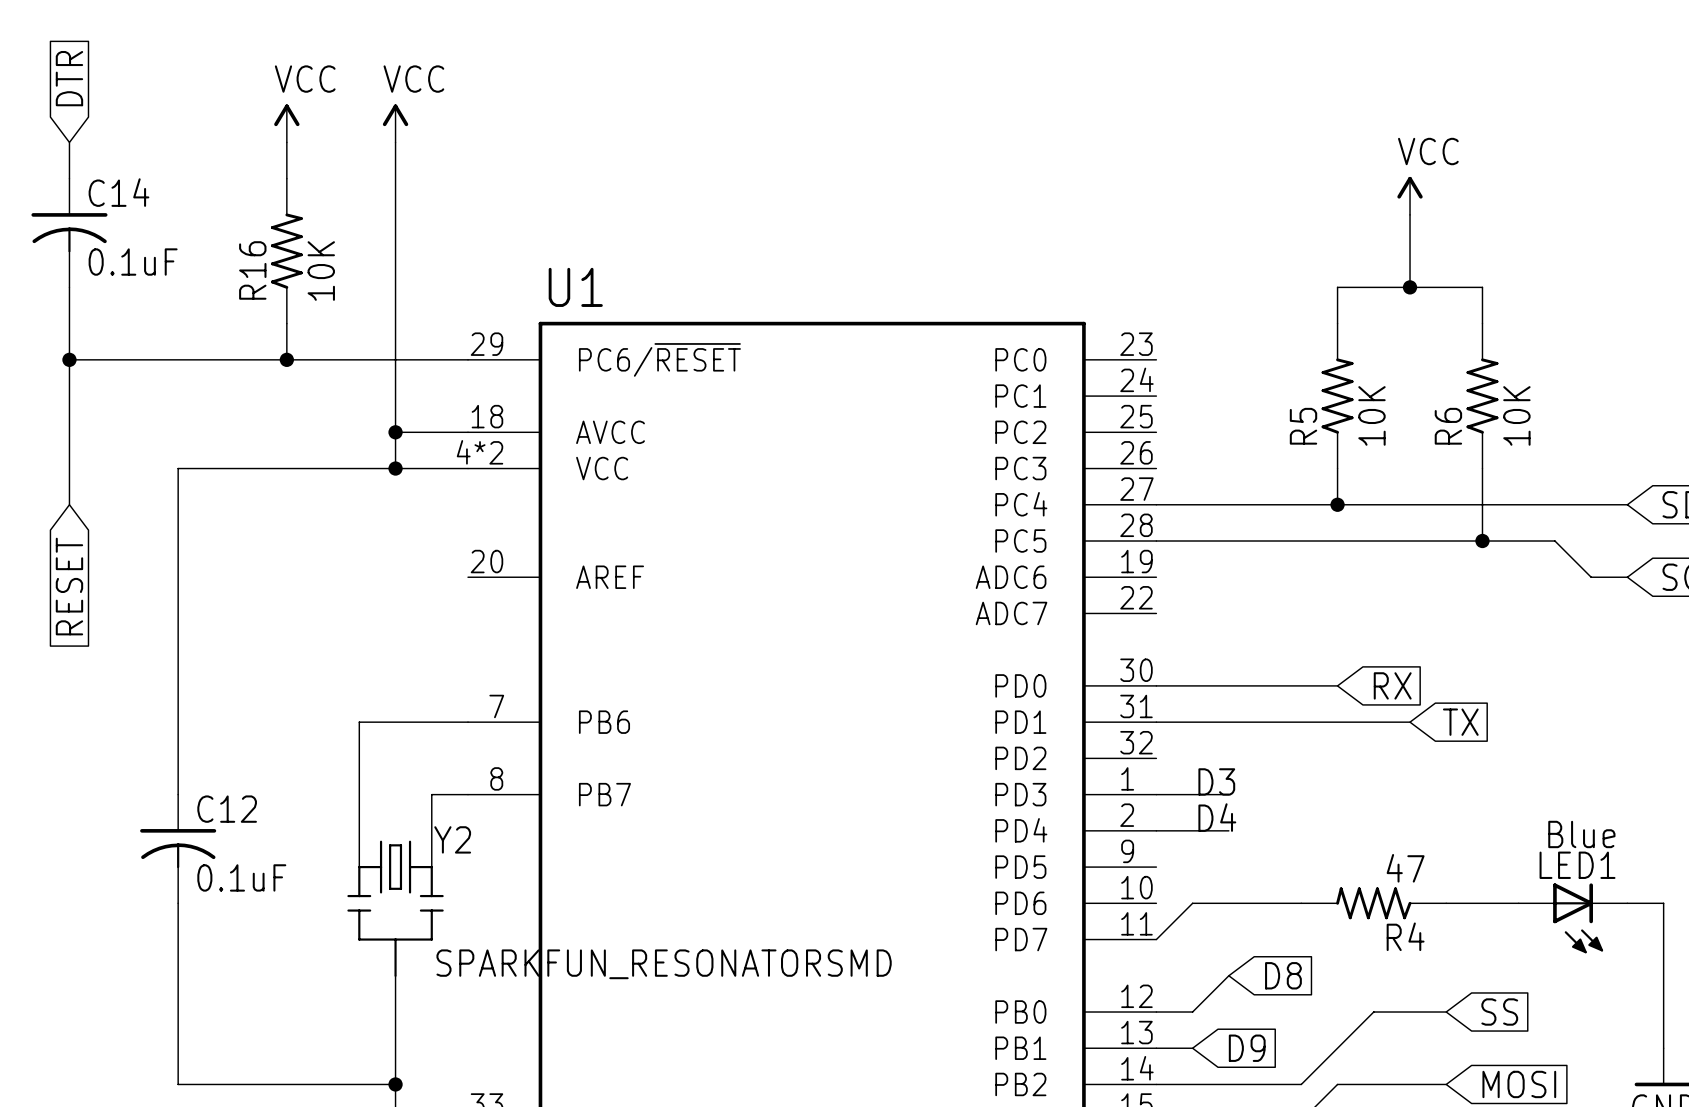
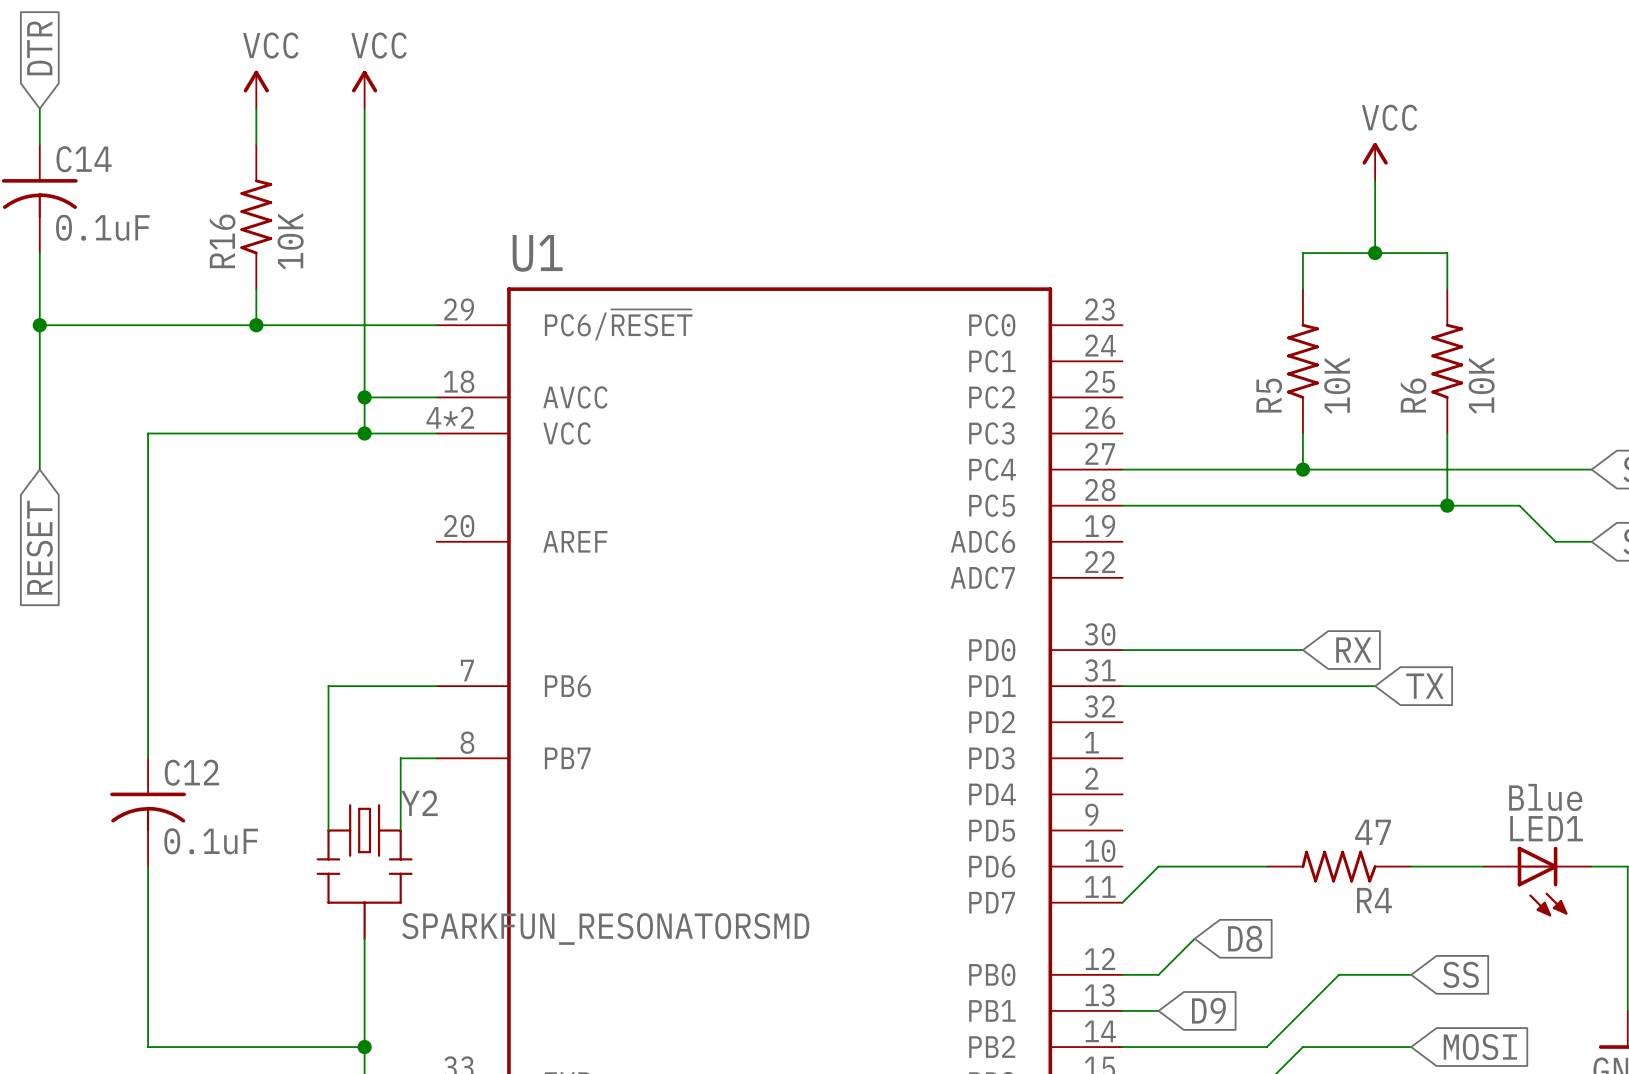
label: D3 (1216, 781) -> none
wire: (1156, 794) (1228, 794) -> none
label: D4 (1217, 817) -> none
wire: (1156, 830) (1228, 830) -> none

